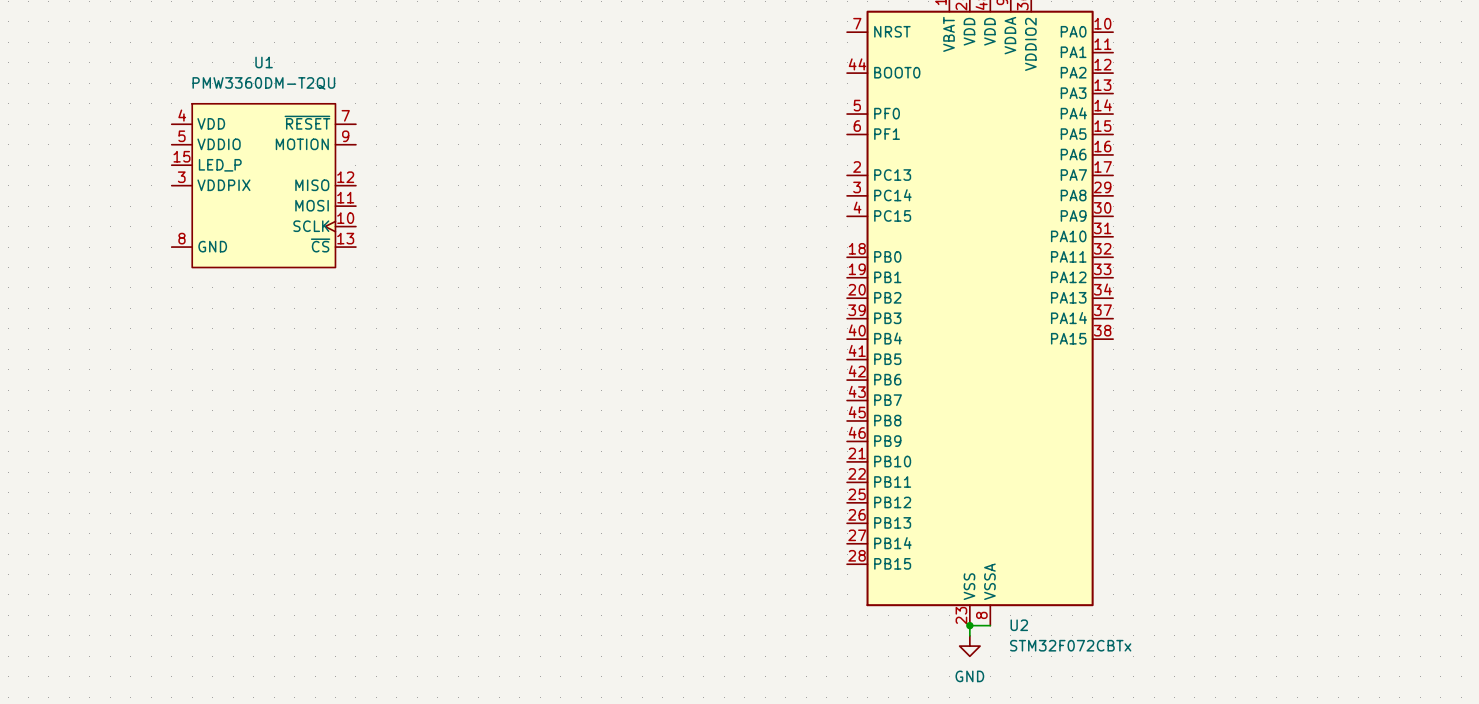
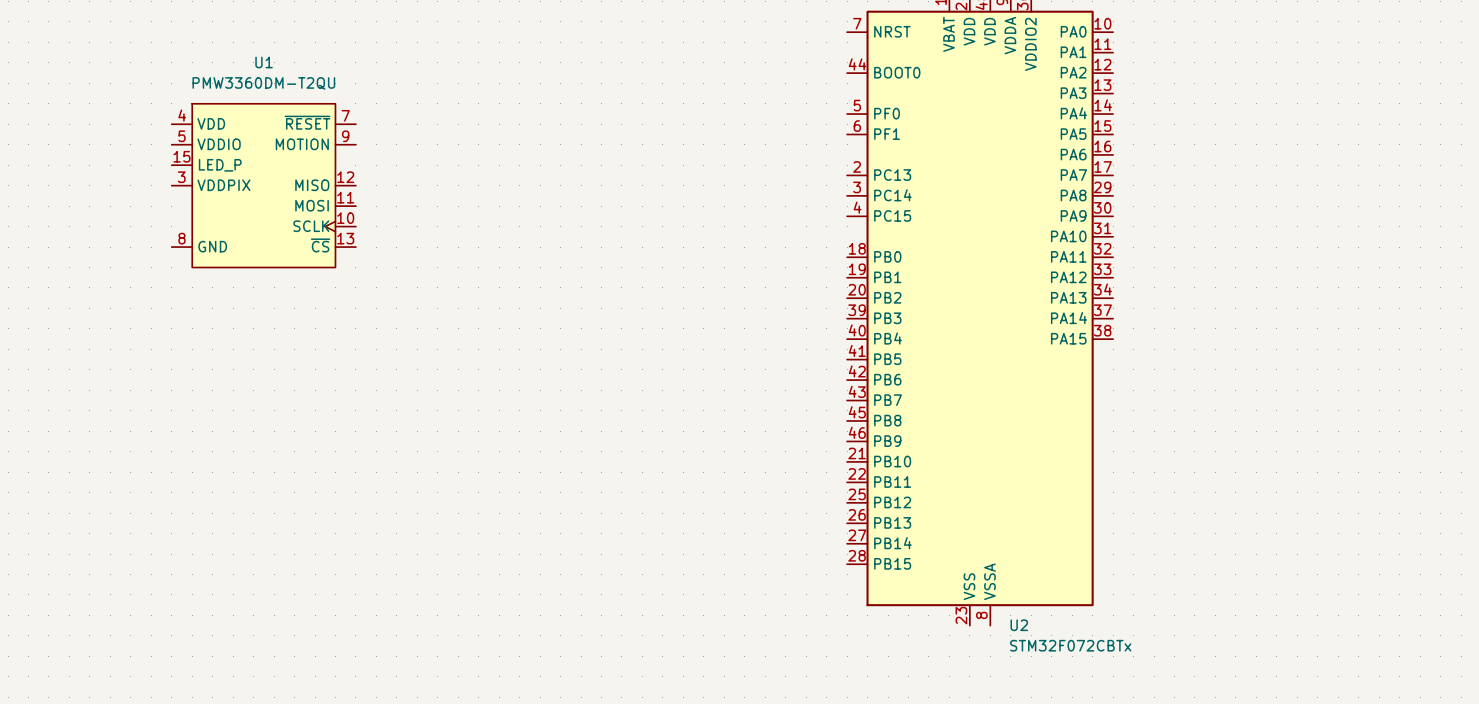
junction: (969, 625) -> none
wire: (990, 625) (969, 625) (969, 635) -> none
power symbol: GND (969, 646) -> none

